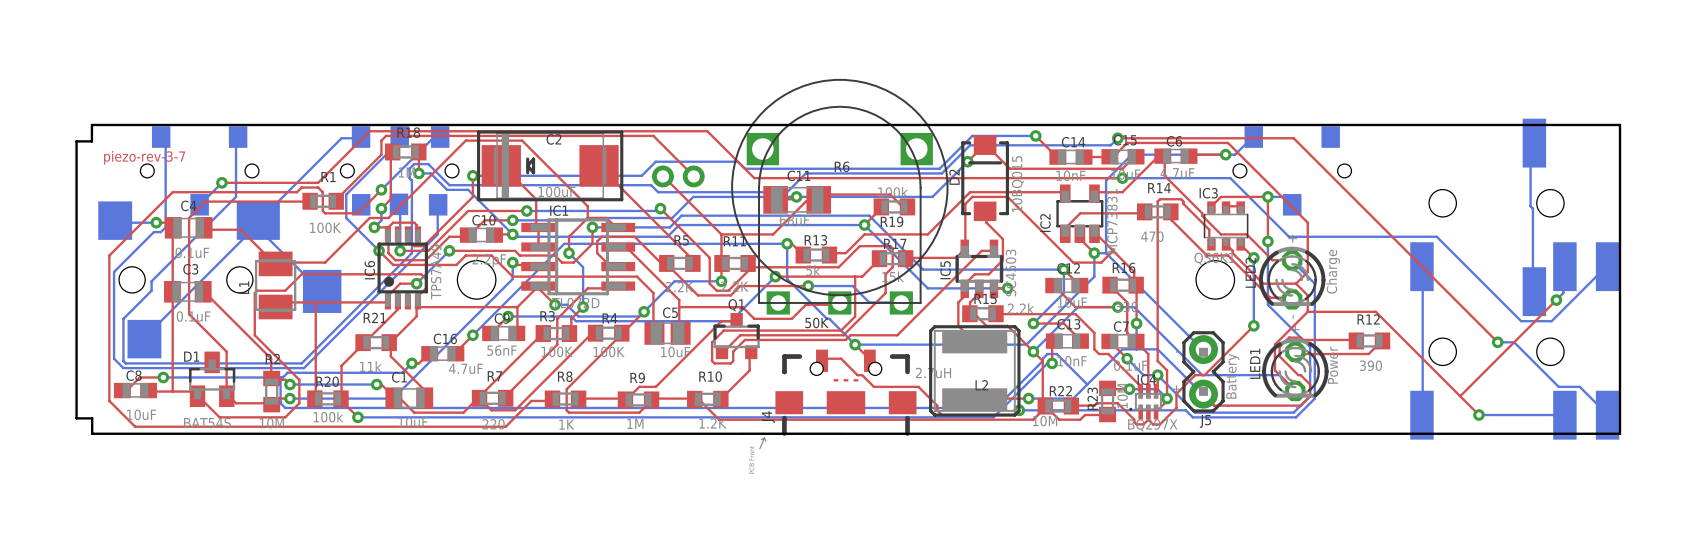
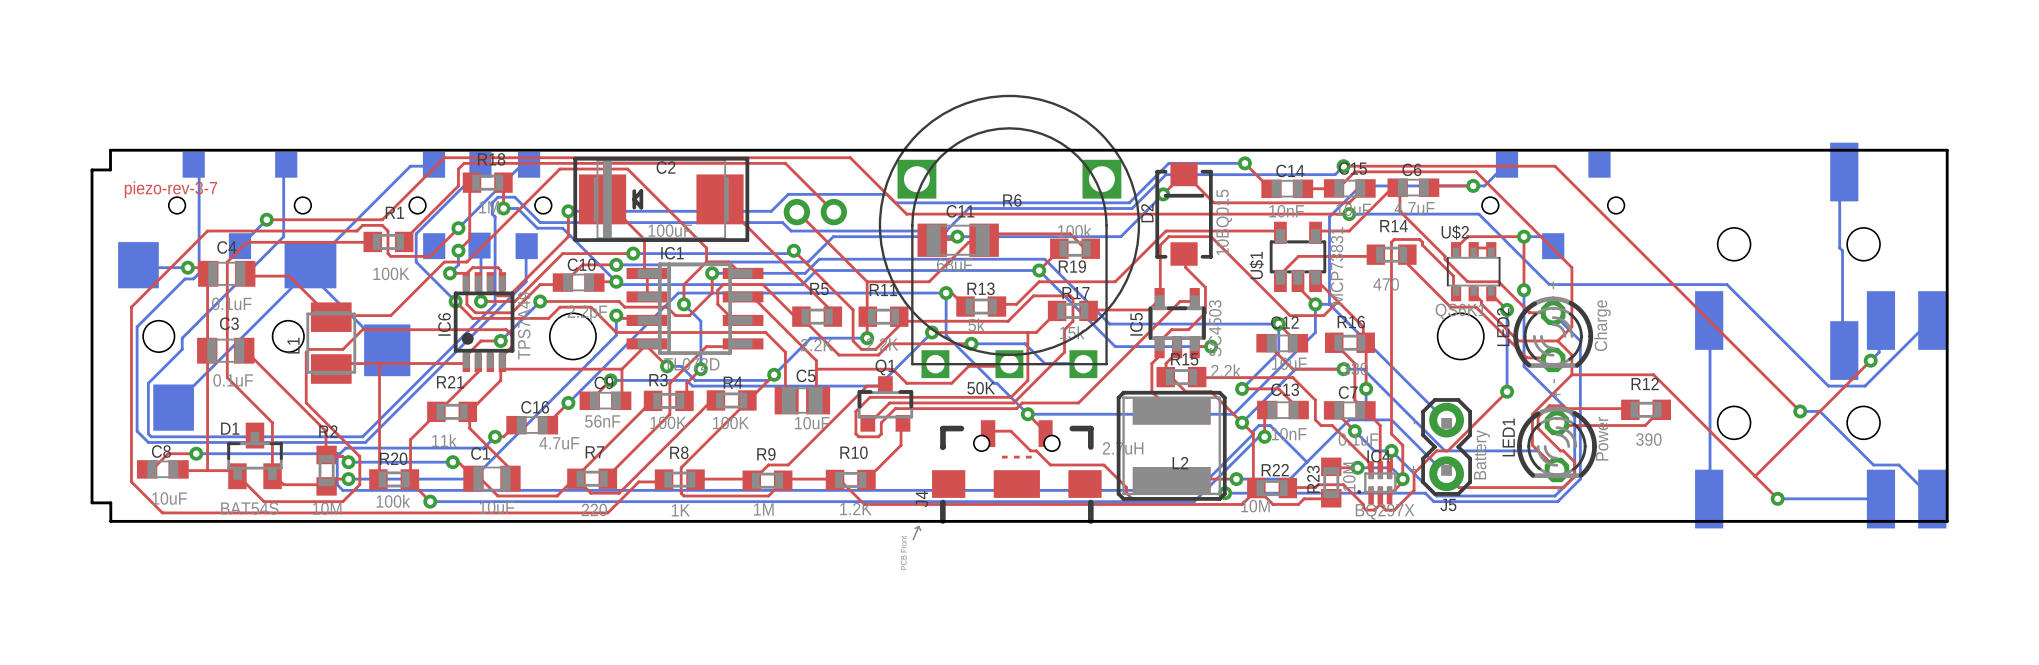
IC3 name: IC3 (1208, 193) -> U$2 (1455, 232)
IC2 name: IC2 (1045, 223) -> U$1 (1256, 265)

